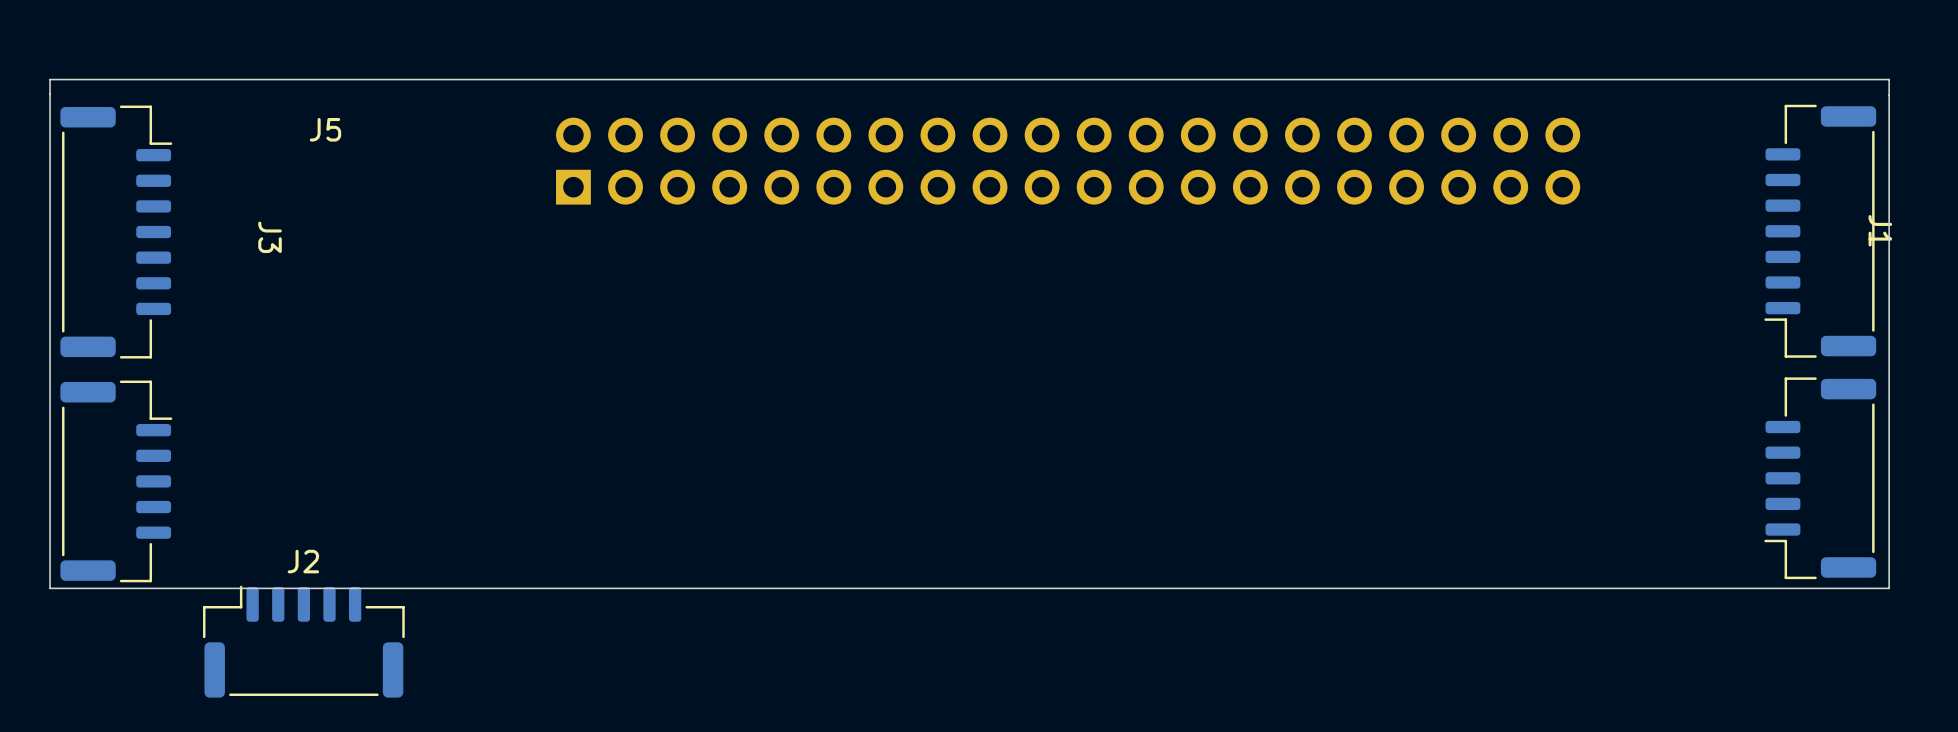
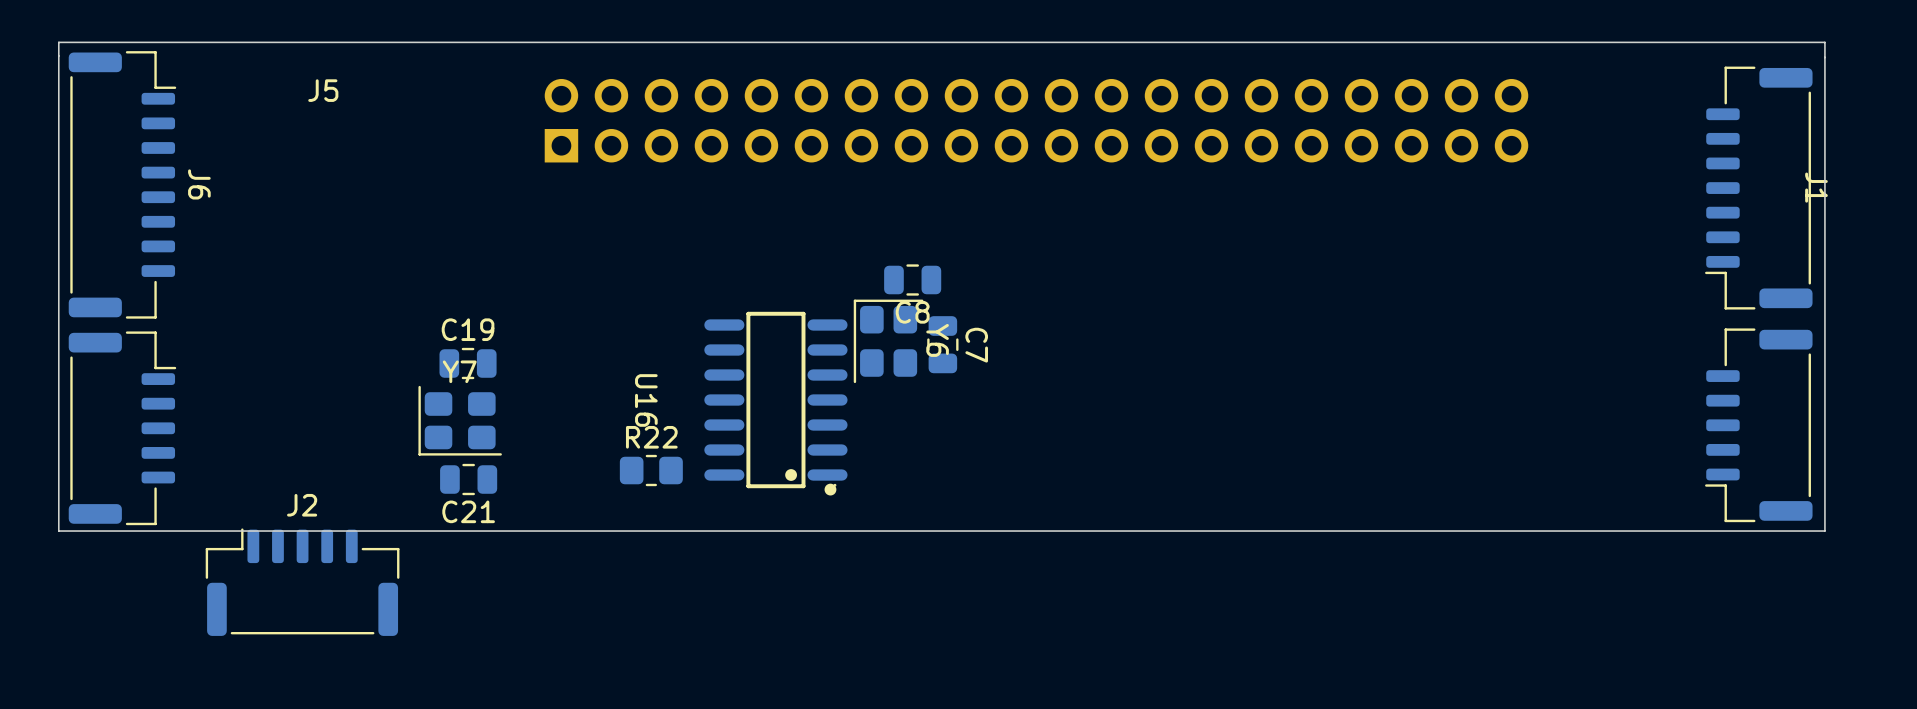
J6: none -> (122, 184)
J3: (116, 232) -> none
C8: none -> (912, 279)
Y6: none -> (888, 341)
C7: none -> (942, 344)
C19: none -> (468, 363)
U16: none -> (775, 403)
Y7: none -> (460, 420)
R22: none -> (651, 470)
C21: none -> (468, 479)

